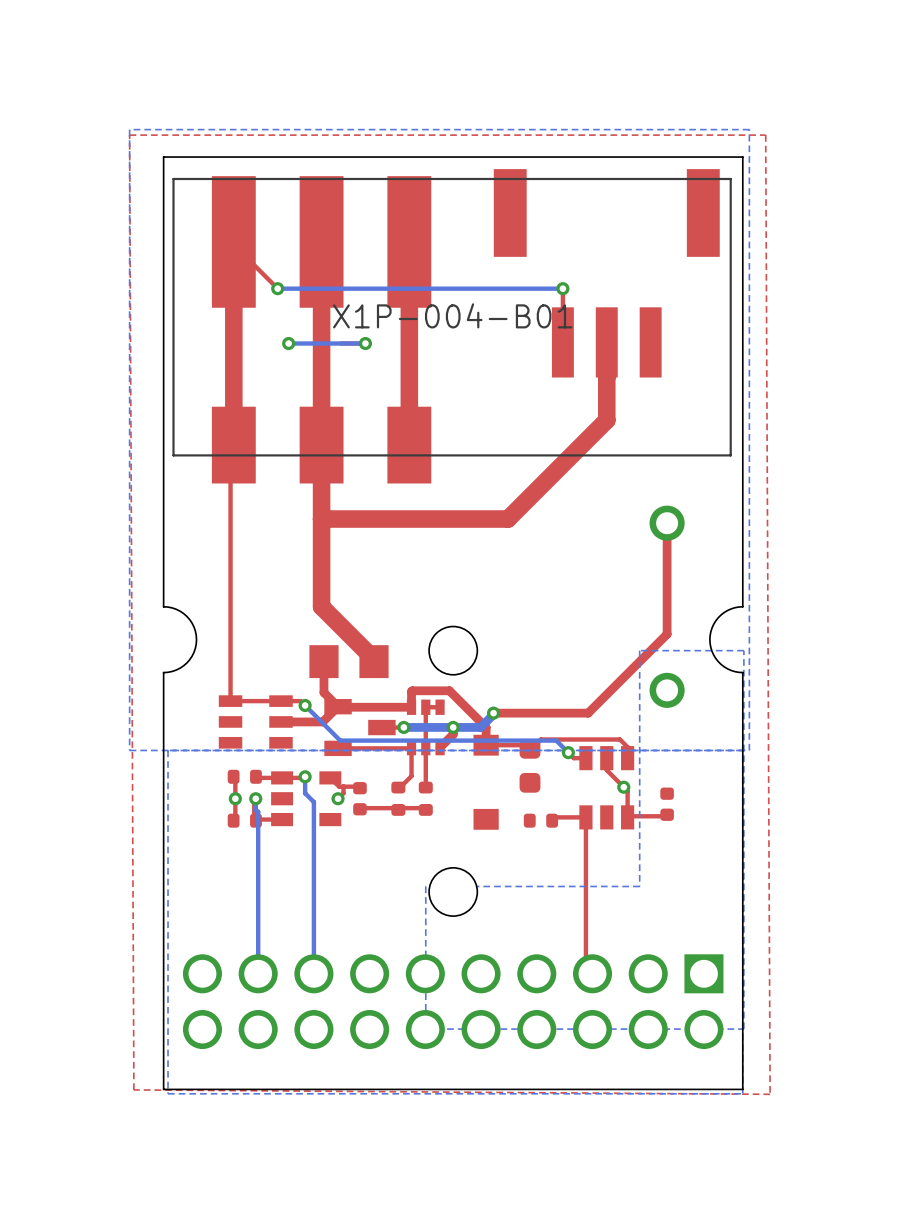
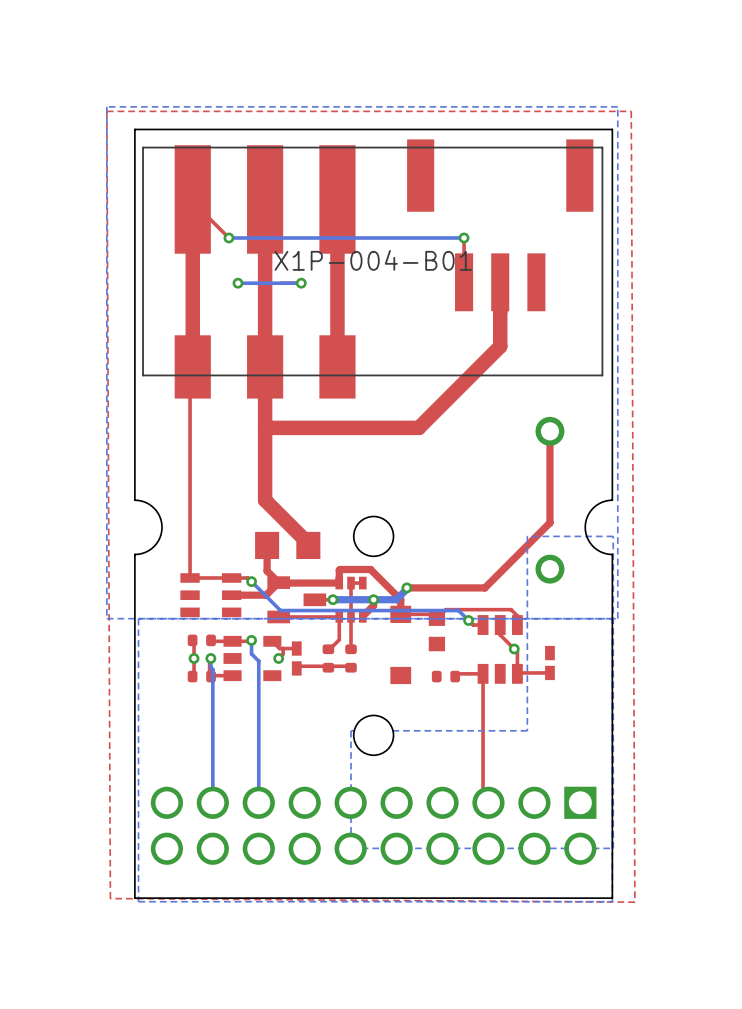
part footprint: [519, 738, 541, 793] -> [428, 611, 446, 652]
part footprint: [353, 782, 367, 816] -> [291, 641, 302, 676]
part footprint: [660, 787, 674, 821] -> [545, 645, 555, 681]

